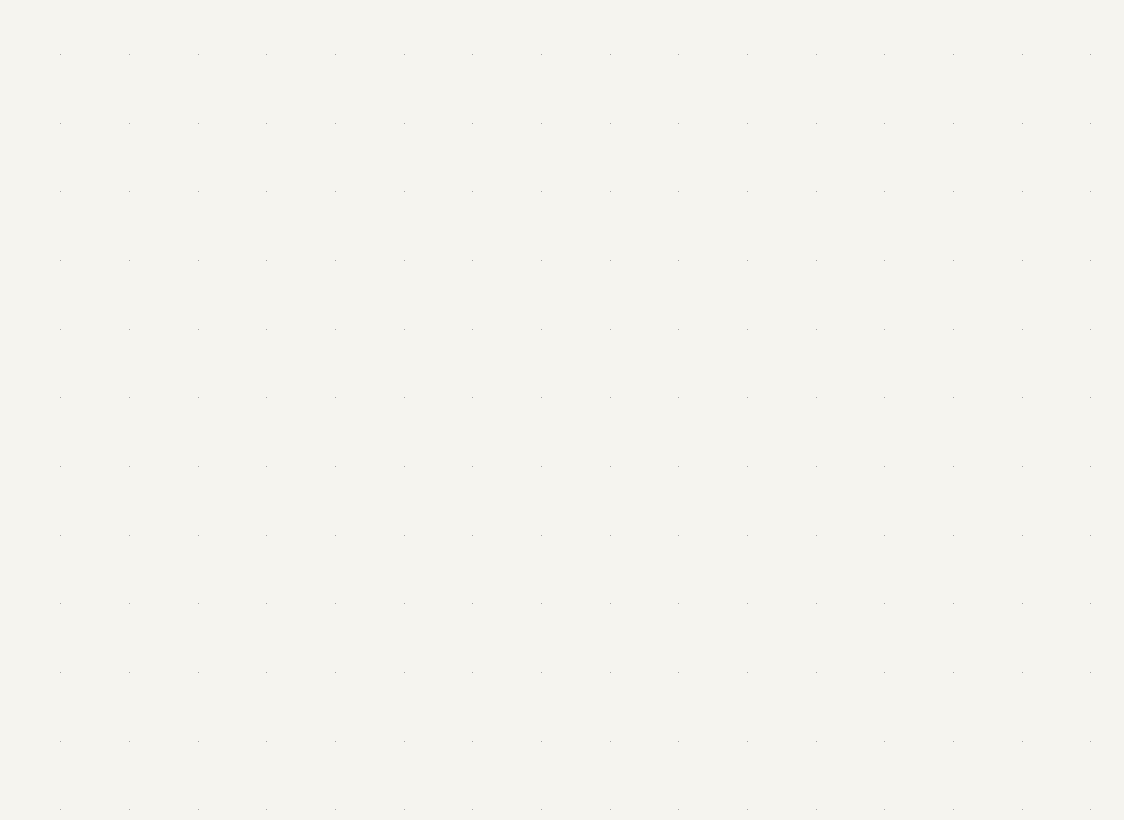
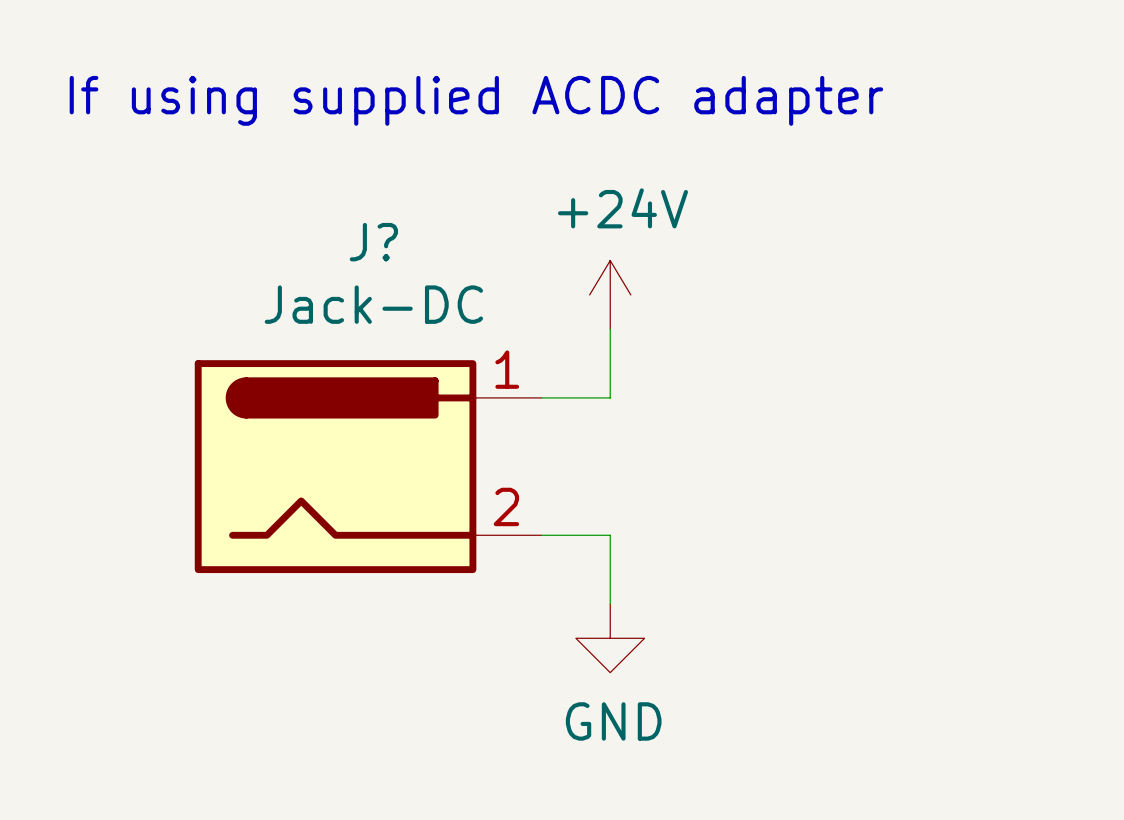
text: none -> If using supplied ACDC adapter (476, 100)
power symbol: none -> +24V (610, 294)
wire: none -> (610, 329) (610, 397) (541, 397)
J?: none -> Jack-DC (368, 466)
wire: none -> (541, 535) (610, 535) (610, 603)
power symbol: none -> GND (610, 638)

